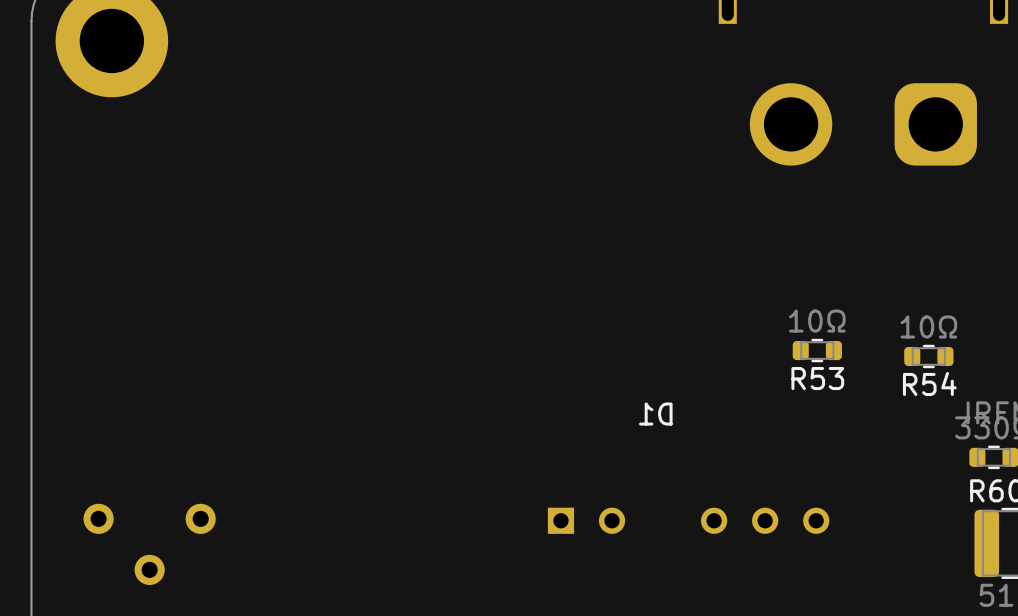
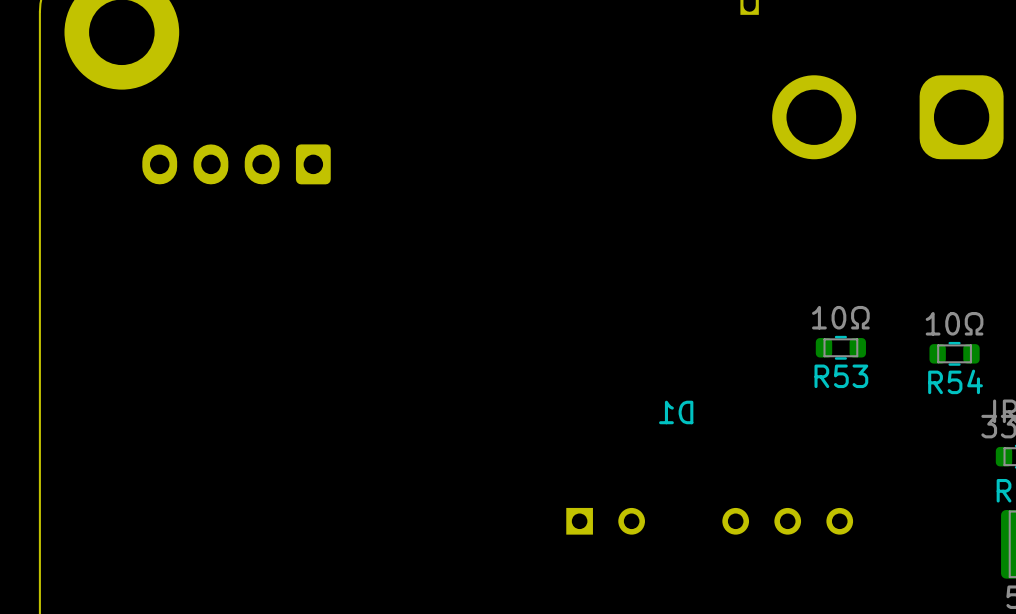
part: none -> (236, 164)
part: (149, 544) -> none

